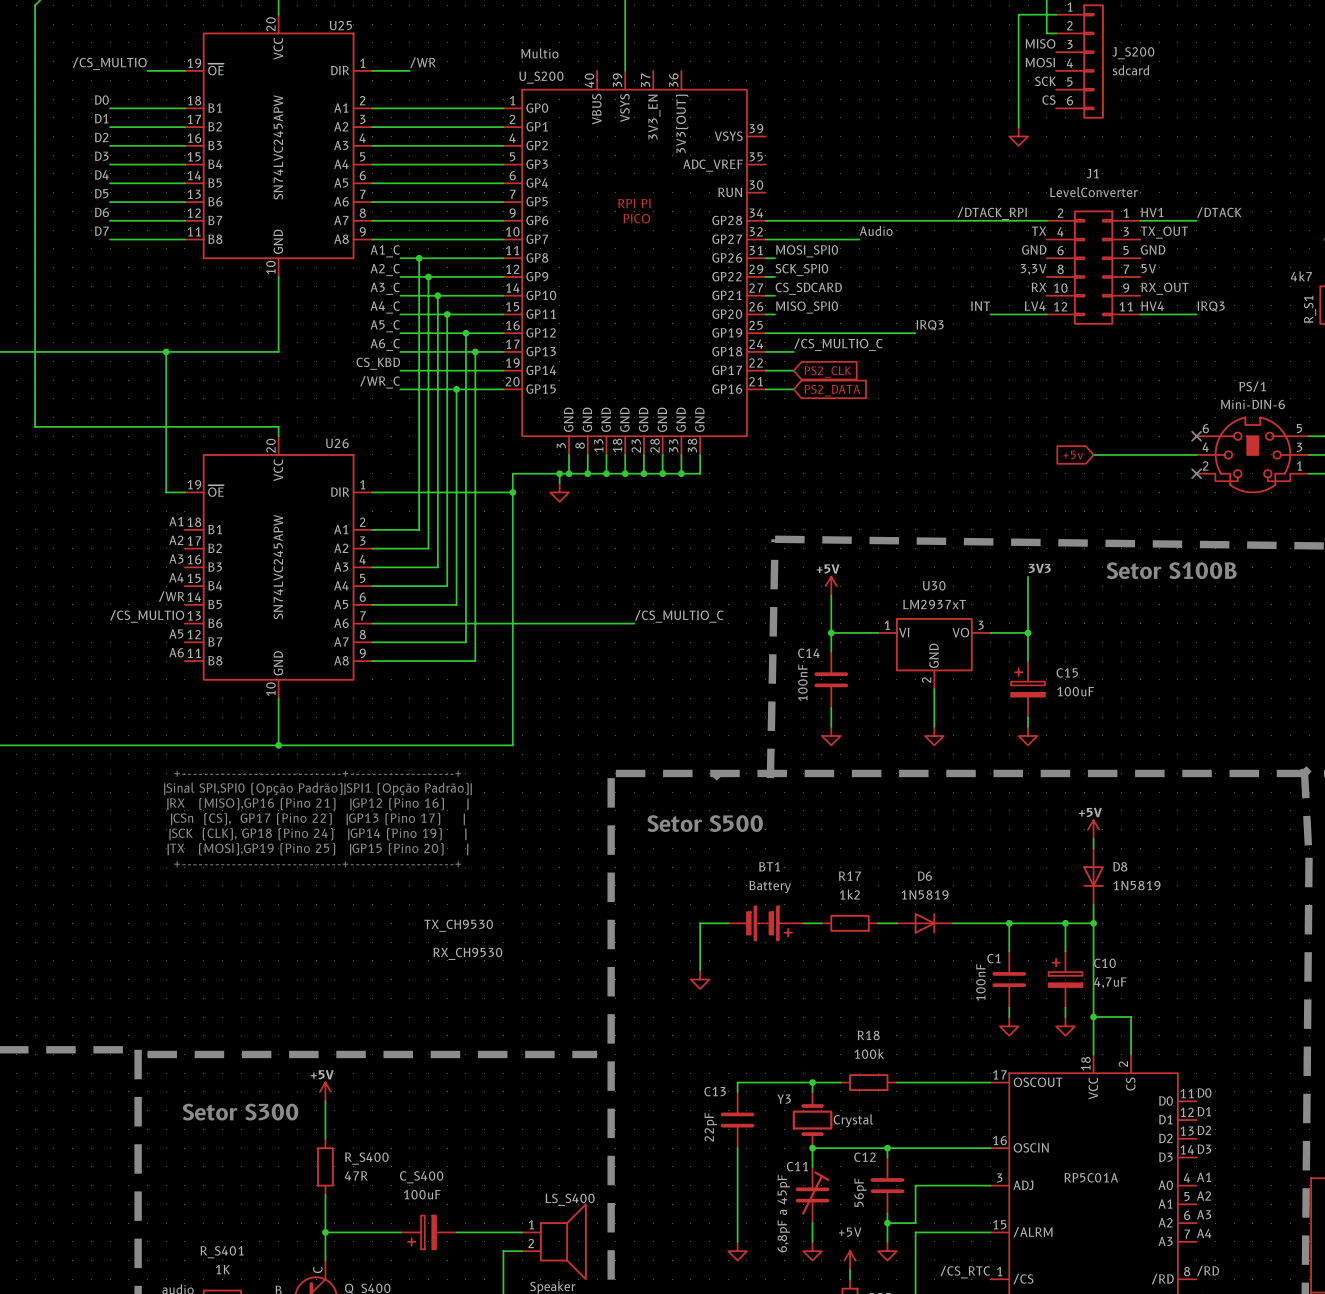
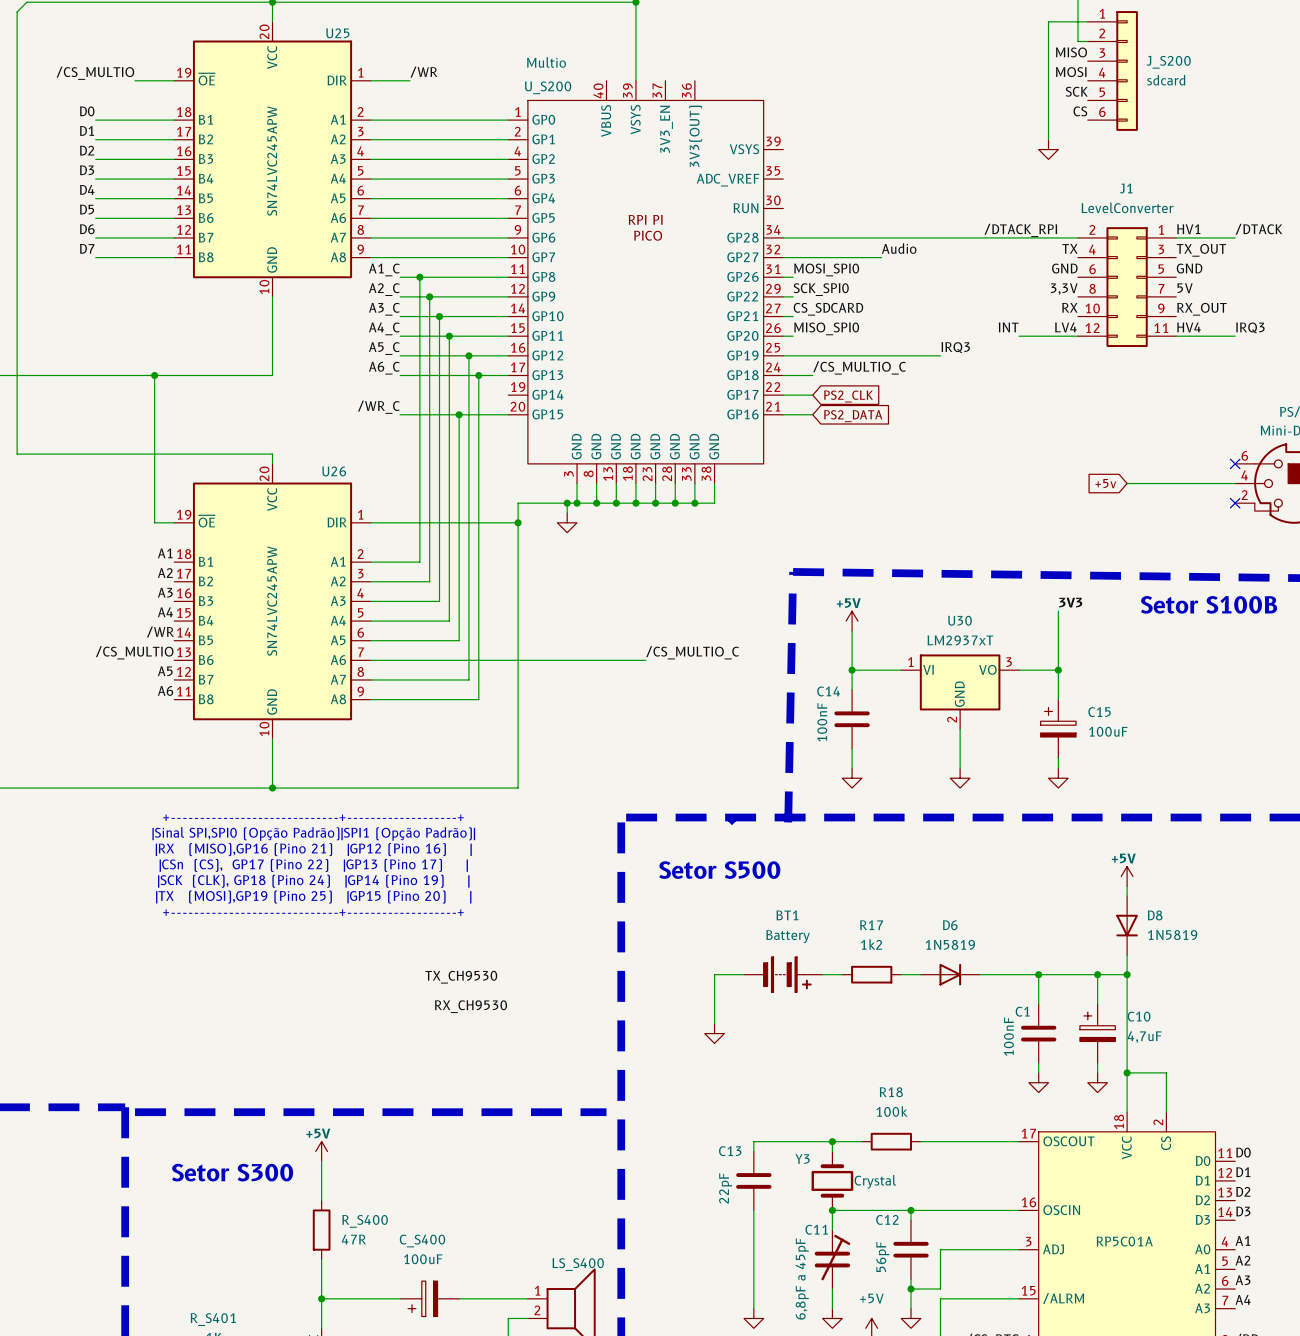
label: CS_KBD (378, 363) -> none
wire: (400, 370) (503, 370) -> none

